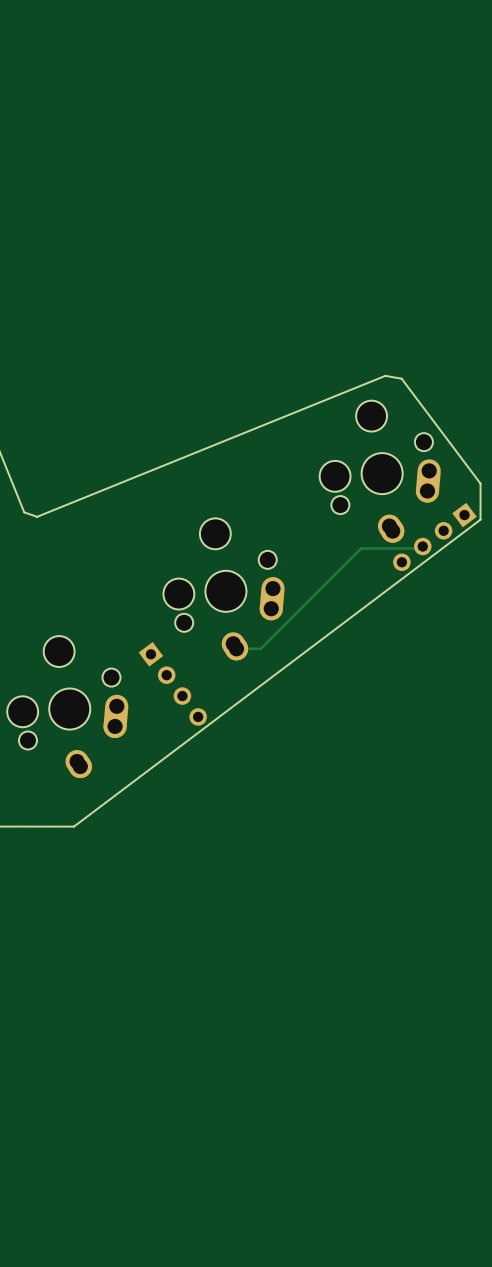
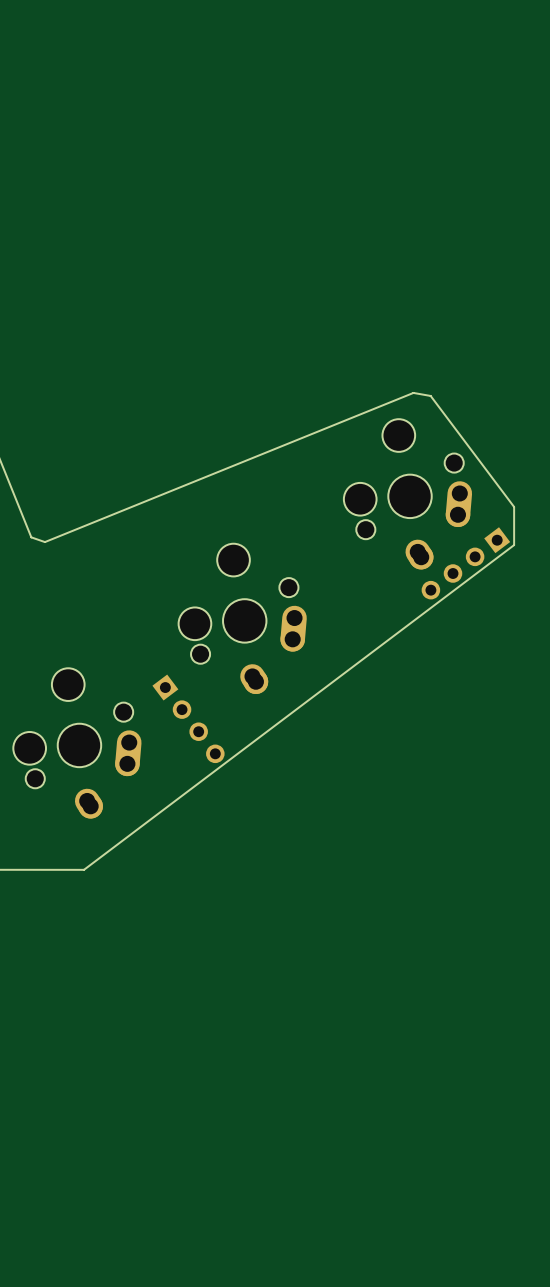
track: (422, 546) (420, 548) (361, 548) (260, 648) (236, 648) -> none

